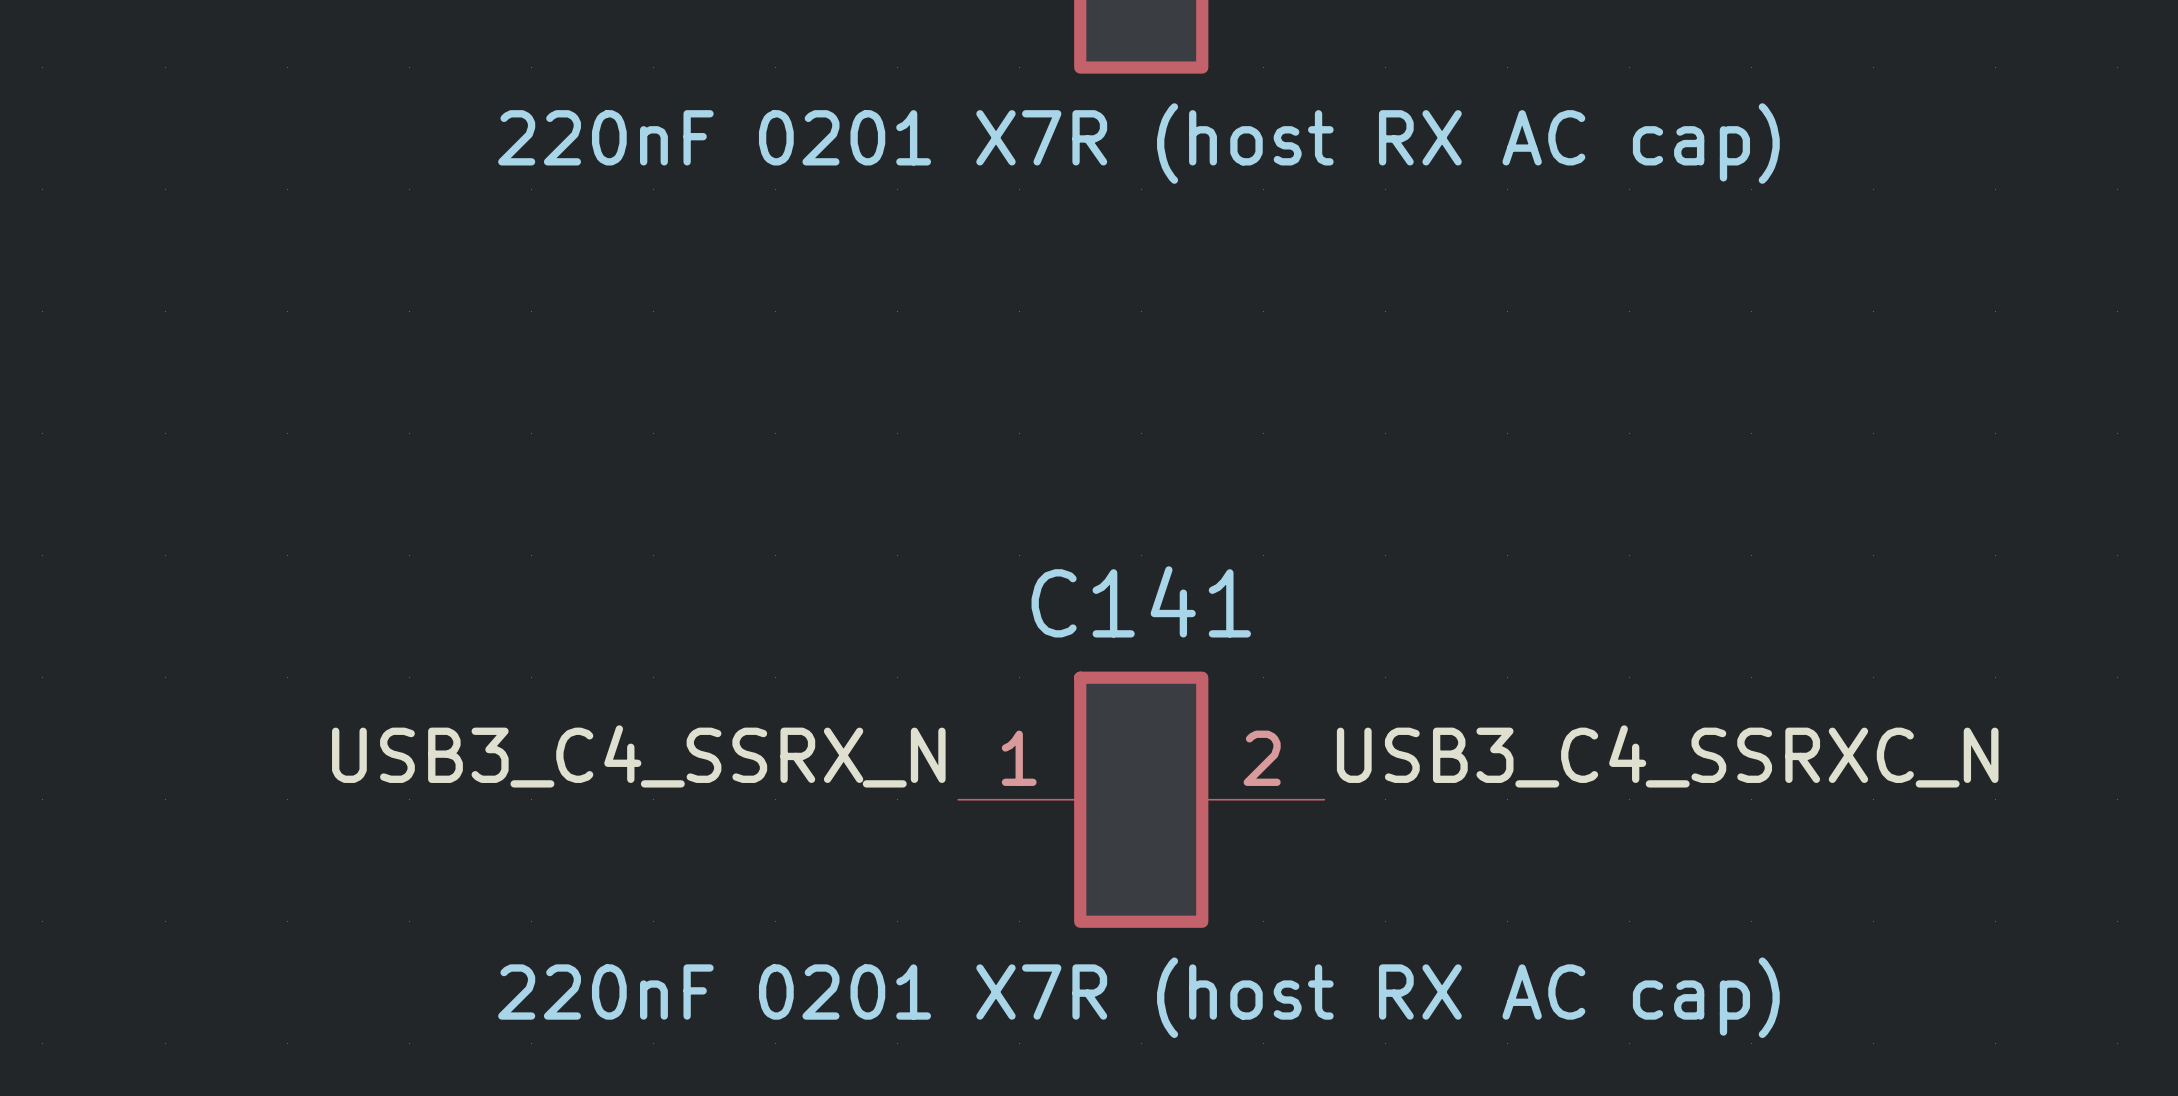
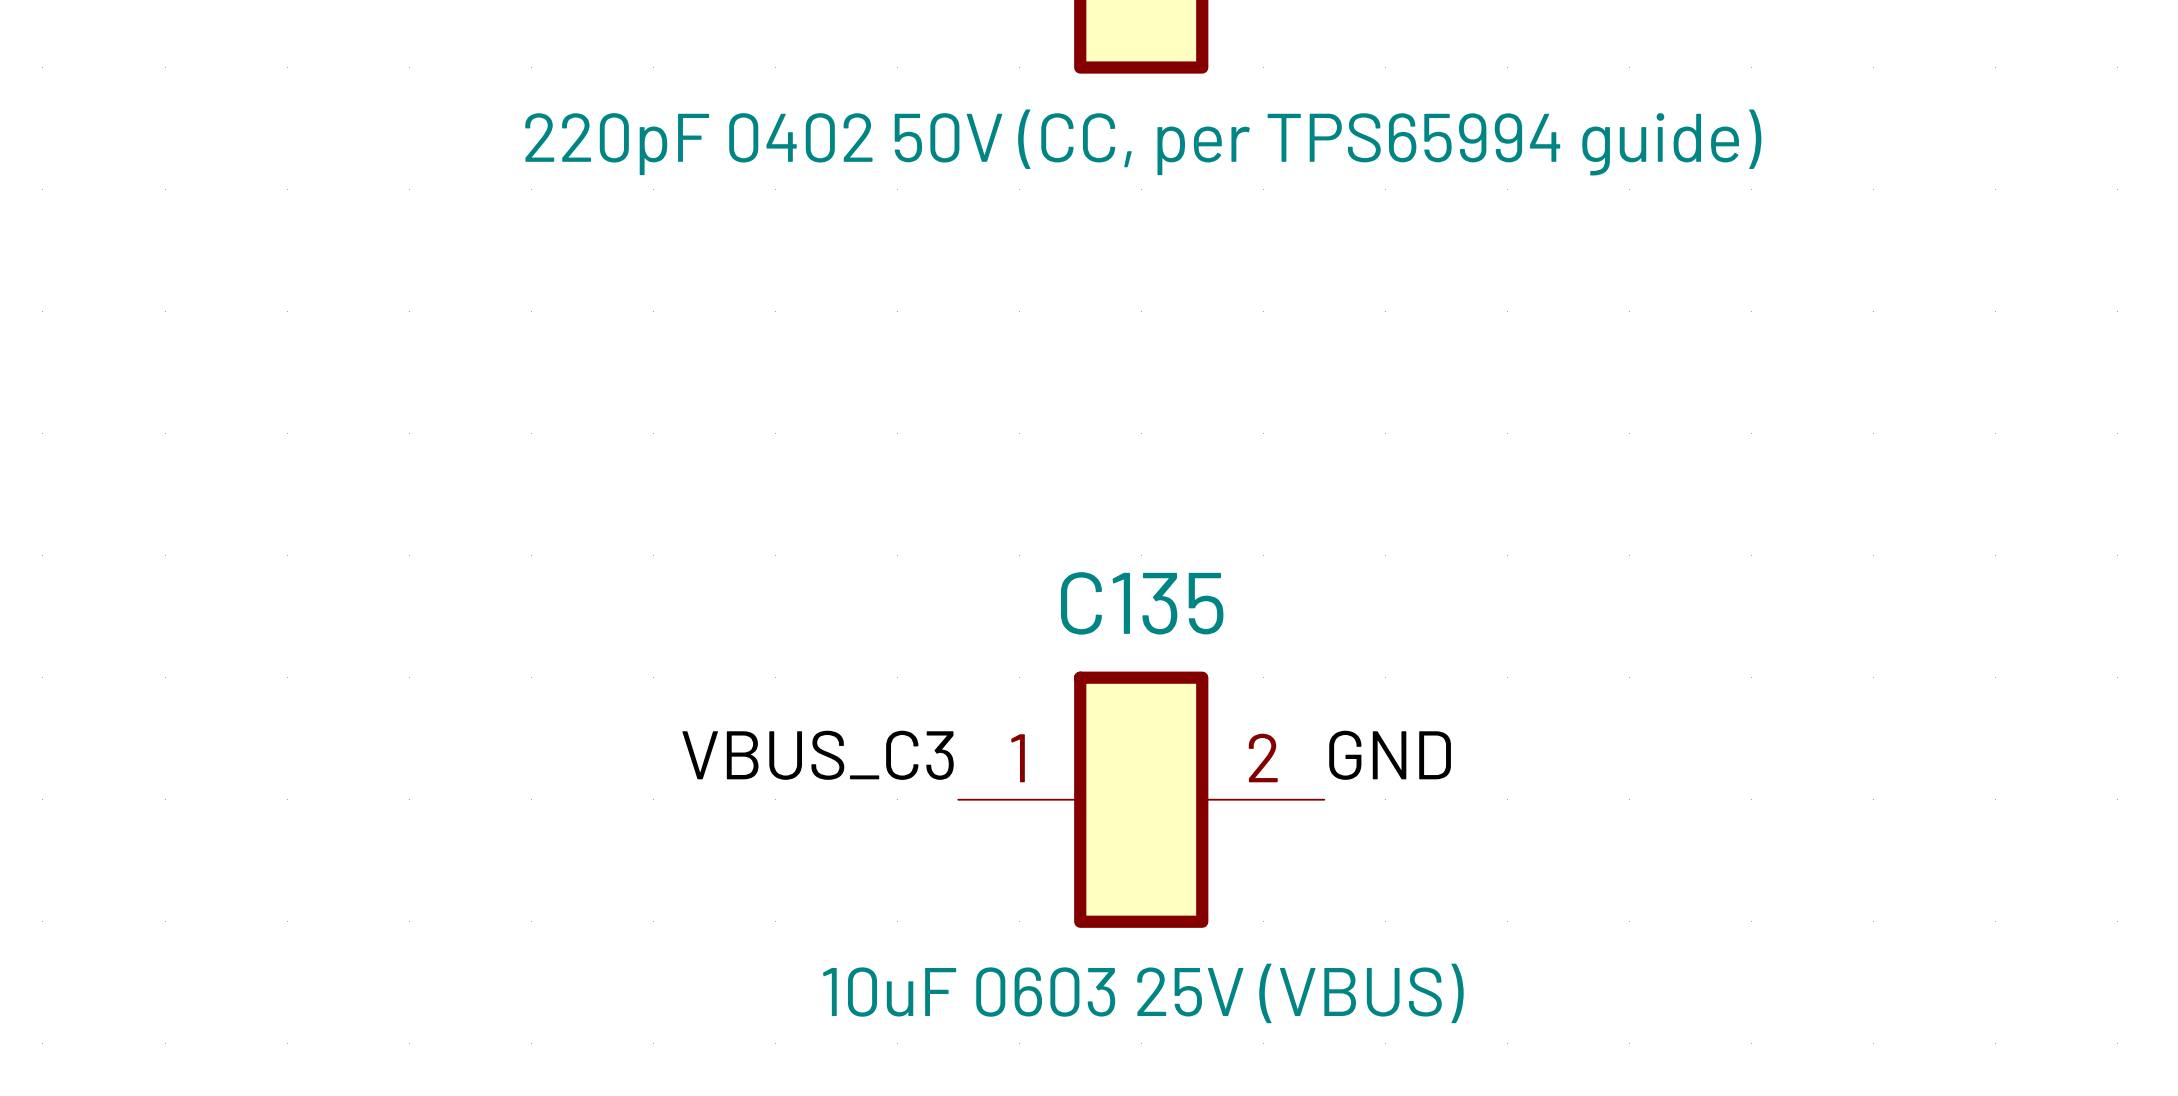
part value: 220nF 0201 X7R (host RX AC cap) (1138, 143) -> 220pF 0402 50V (CC, per TPS65994 guide) (1143, 142)
C141 name: C141 (1141, 601) -> C135 (1142, 603)
label: USB3_C4_SSRX_N (638, 756) -> VBUS_C3 (818, 755)
label: USB3_C4_SSRXC_N (1667, 756) -> GND (1390, 755)
C141 value: 220nF 0201 X7R (host RX AC cap) (1138, 997) -> 10uF 0603 25V (VBUS) (1143, 993)

